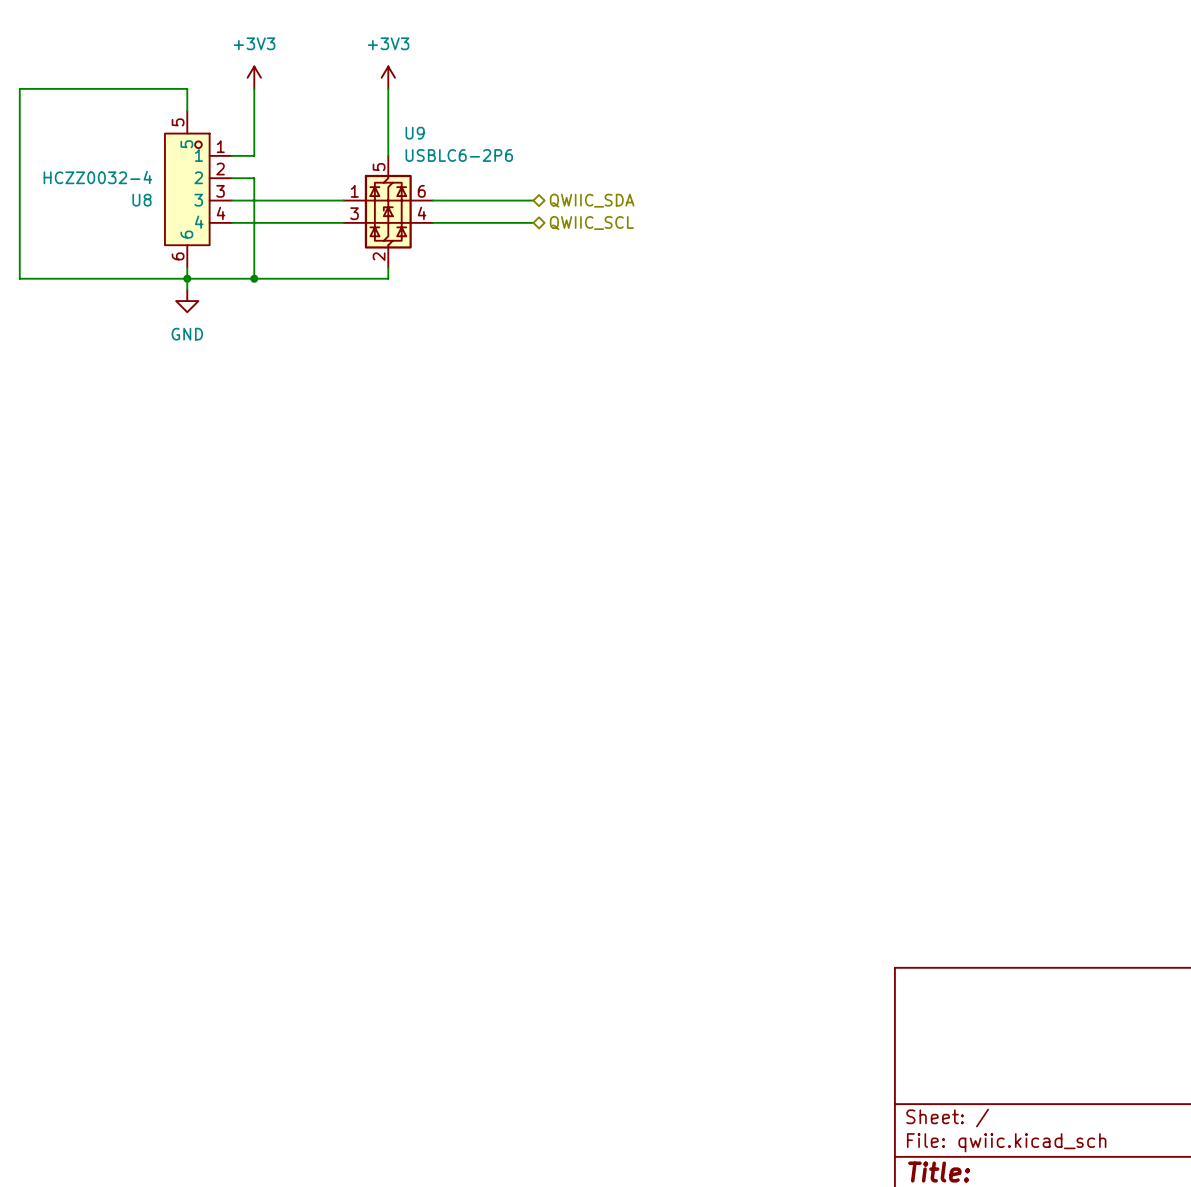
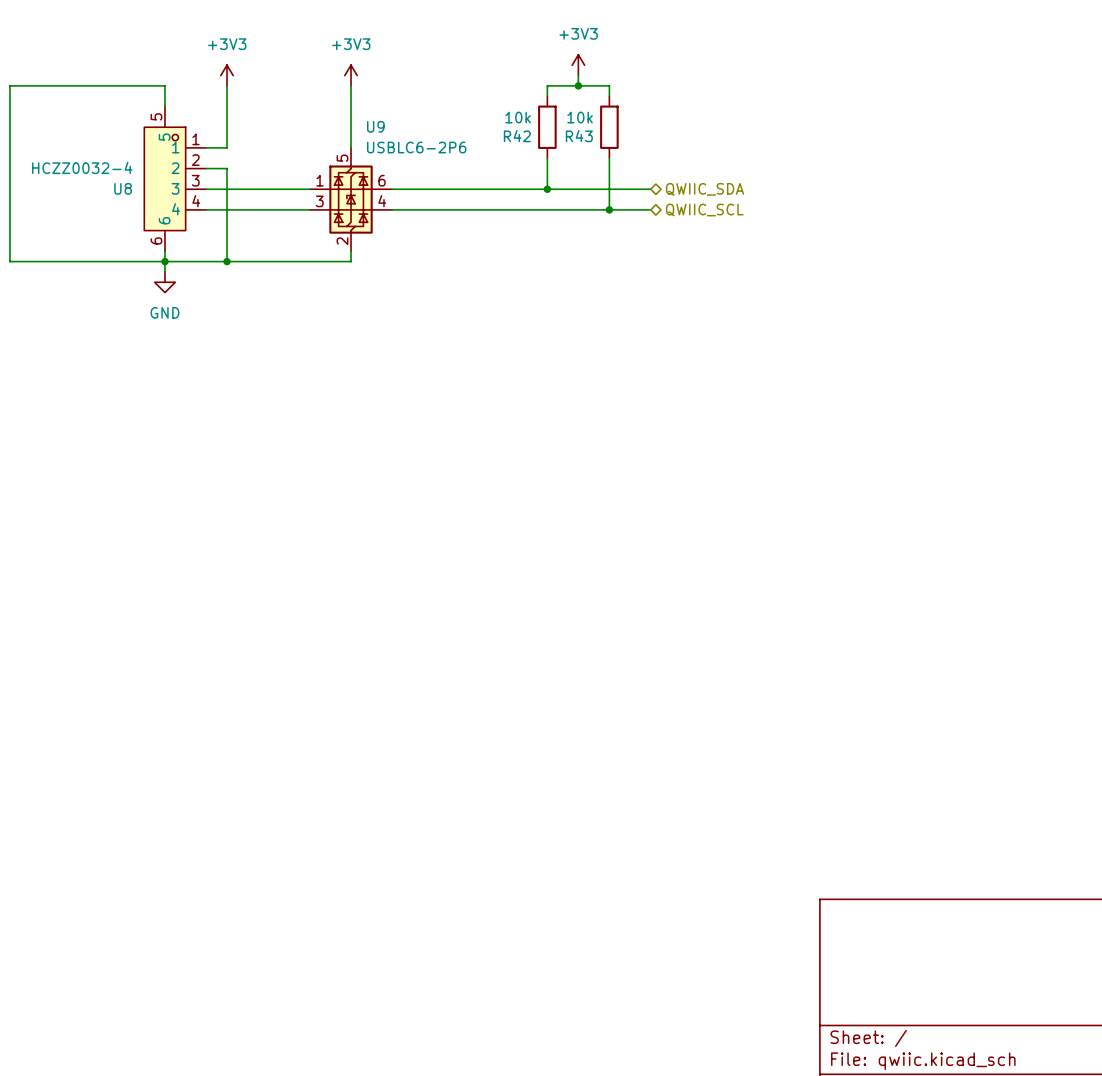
power symbol: none -> +3V3 (578, 65)
wire: none -> (578, 75) (578, 85)
junction: none -> (578, 85)
wire: none -> (547, 96) (547, 85) (609, 85) (609, 96)
R42: none -> 10k (547, 127)
R43: none -> 10k (609, 127)
wire: none -> (547, 158) (547, 189)
wire: none -> (609, 158) (609, 209)
wire: none -> (485, 189) (650, 189)
hierarchical label position: QWIIC_SDA (592, 200) -> QWIIC_SDA (705, 189)
junction: none -> (547, 189)
wire: none -> (485, 209) (650, 209)
junction: none -> (609, 209)
hierarchical label position: QWIIC_SCL (591, 223) -> QWIIC_SCL (704, 210)

